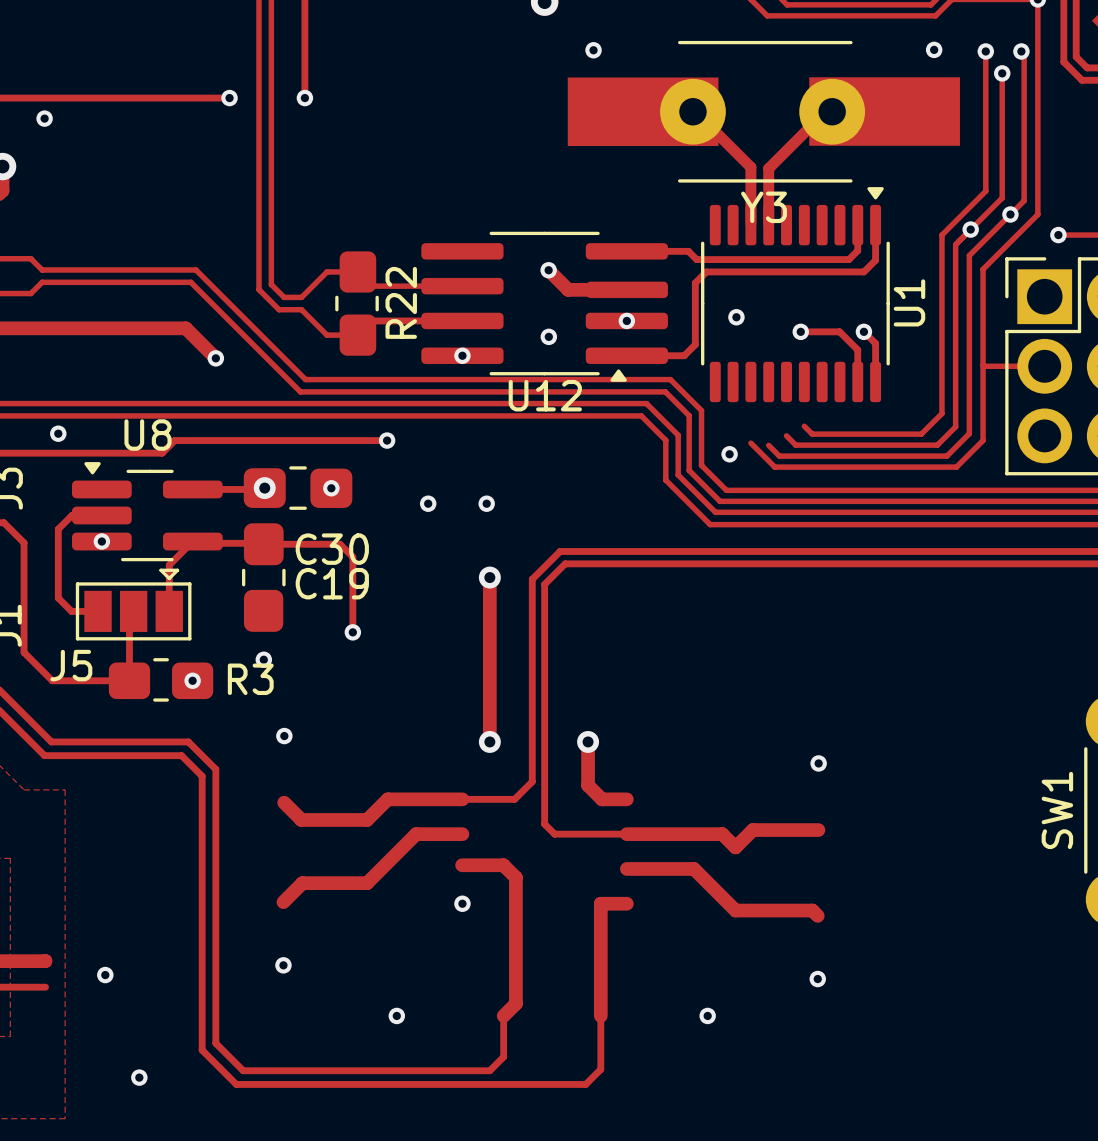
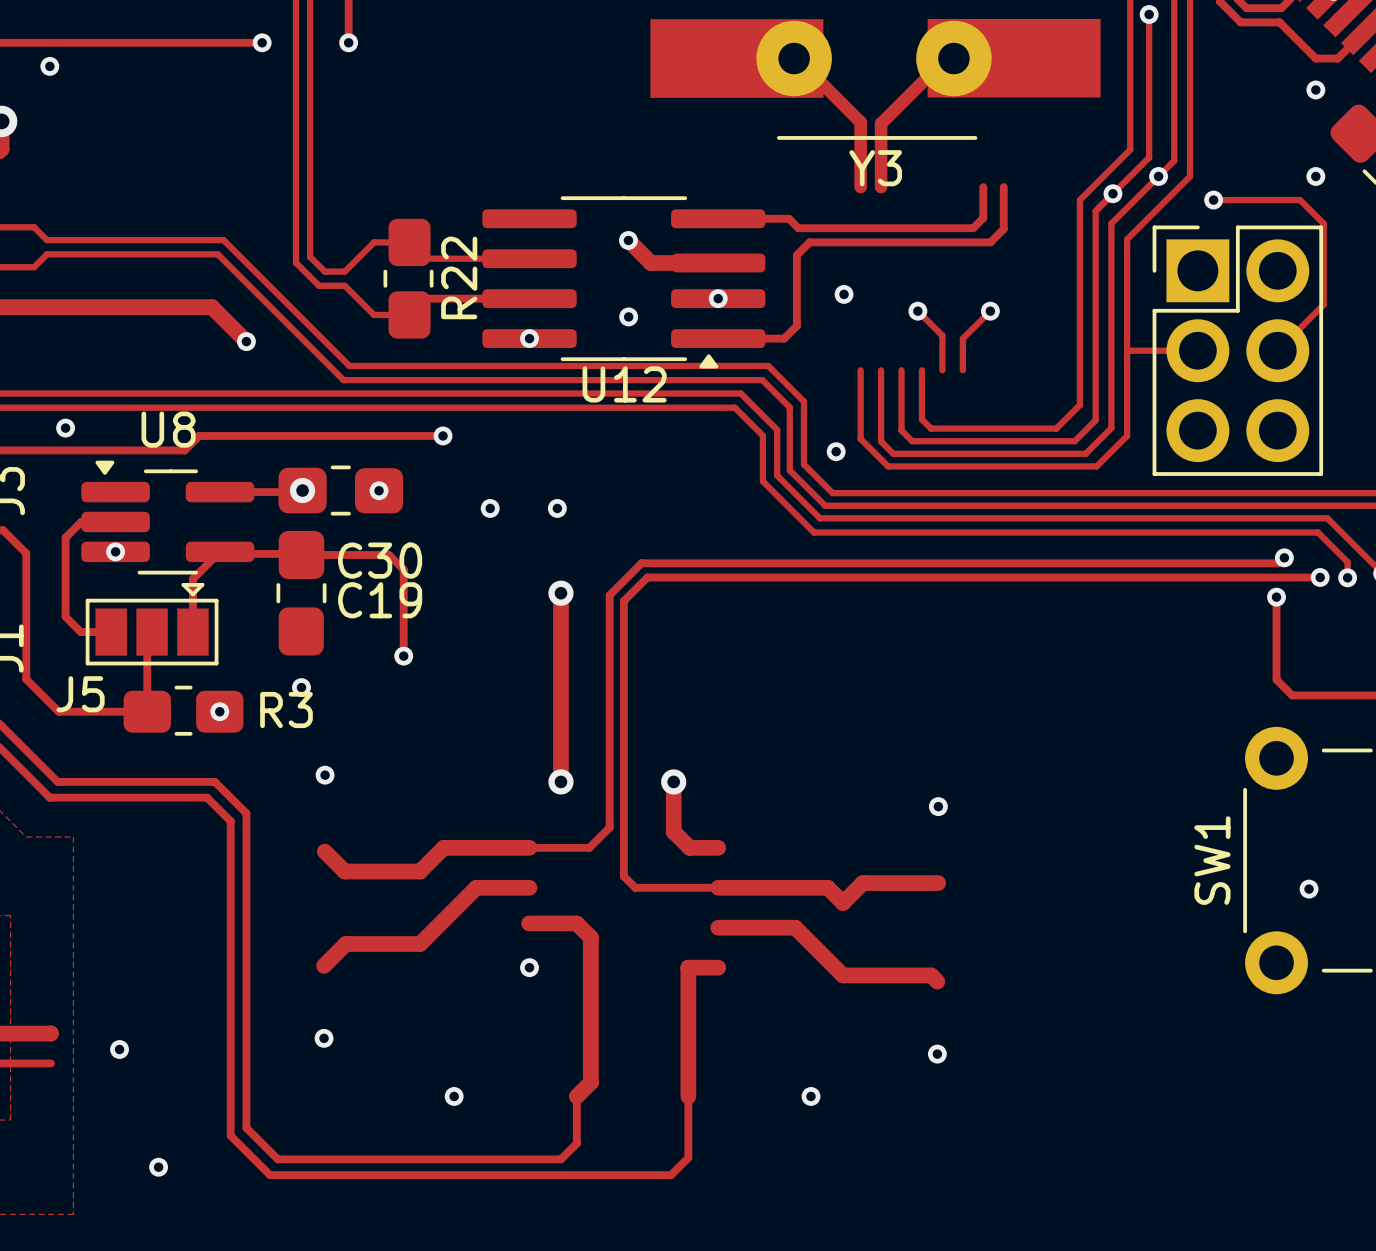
U1: (795, 294) -> none
track: (800, 331) (839, 331) (857, 349) (857, 381) -> (917, 311) (942, 335) (942, 370)
track: (863, 331) (875, 343) (875, 381) -> (990, 311) (962, 338) (962, 370)
track: none -> (860, 370) (860, 438)
track: none -> (881, 370) (881, 441)
track: none -> (901, 370) (901, 430)
track: none -> (921, 370) (921, 419)

